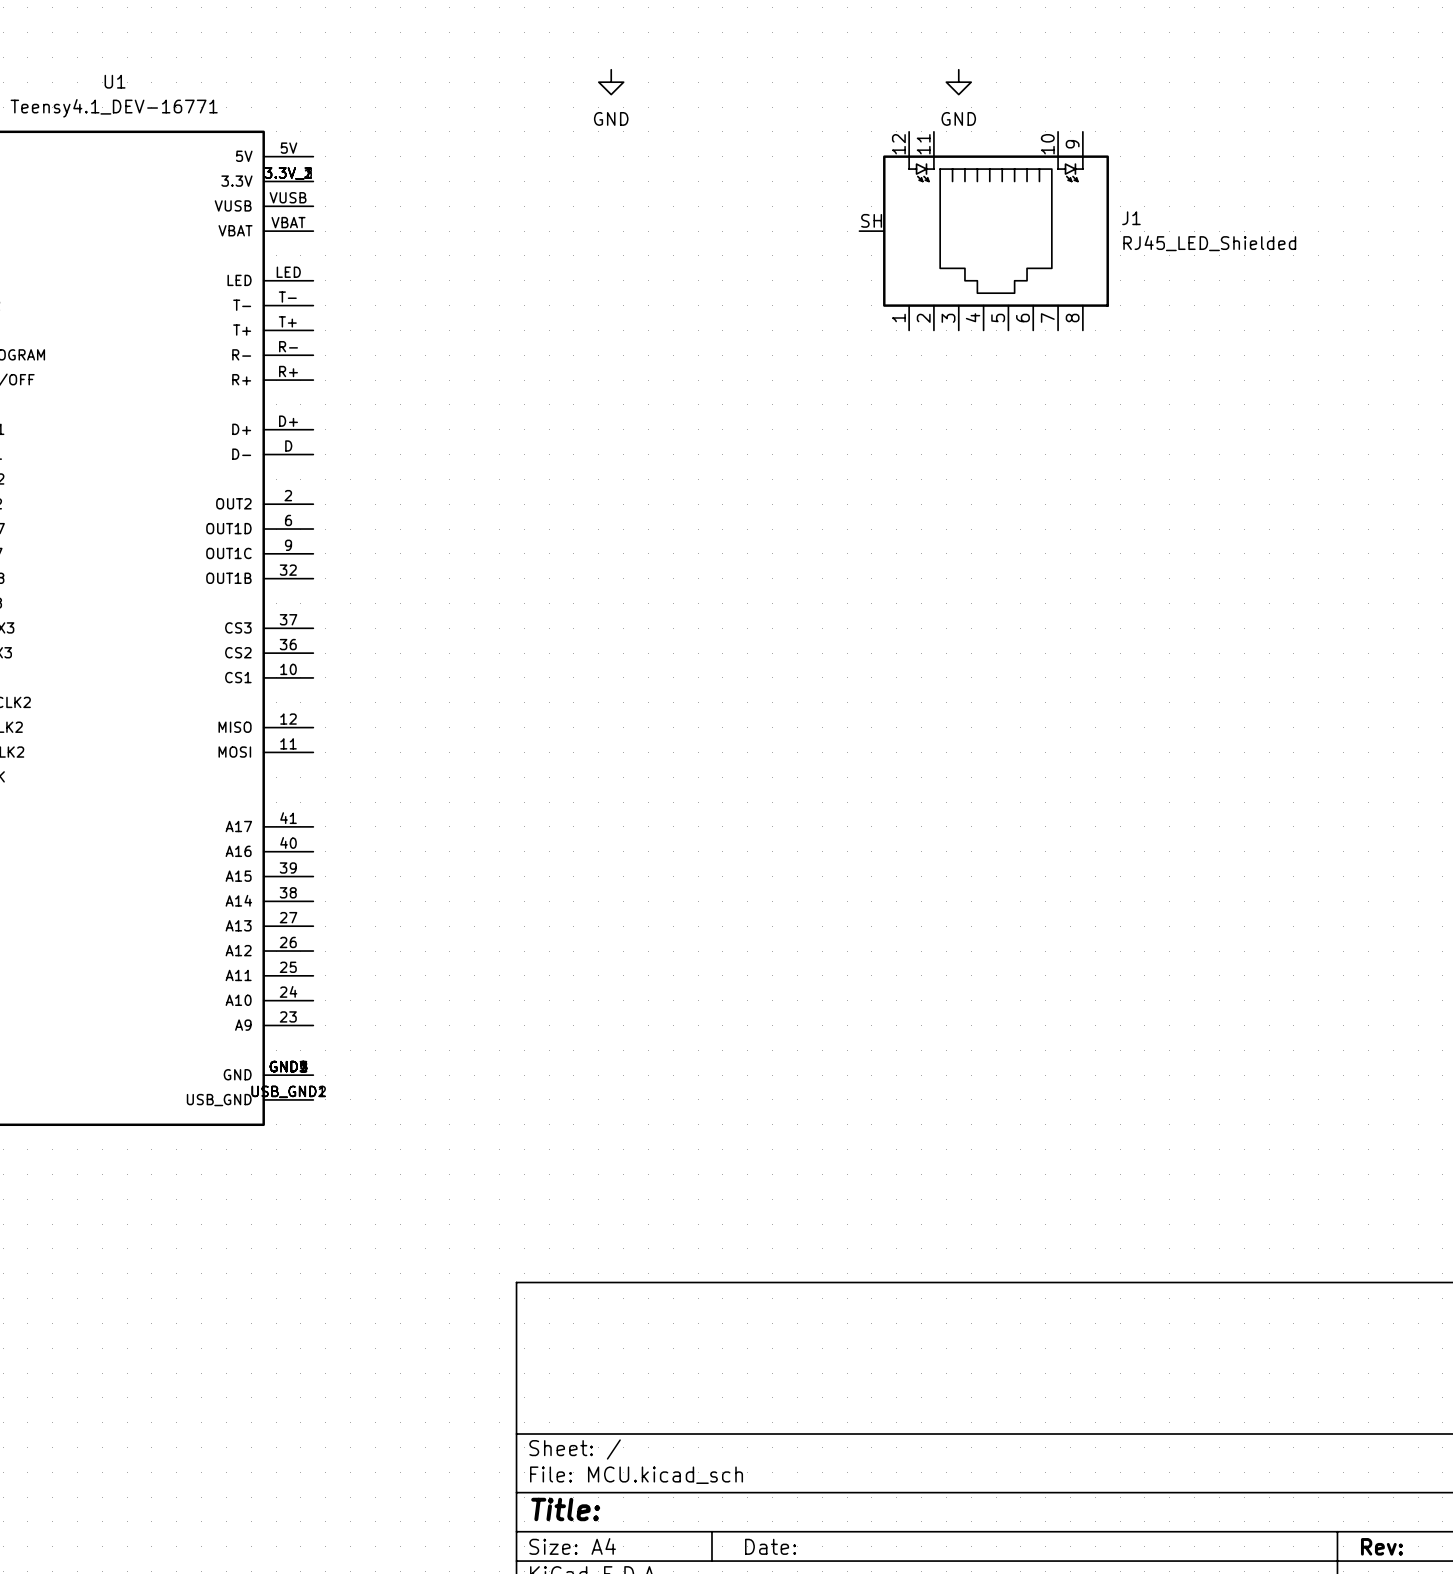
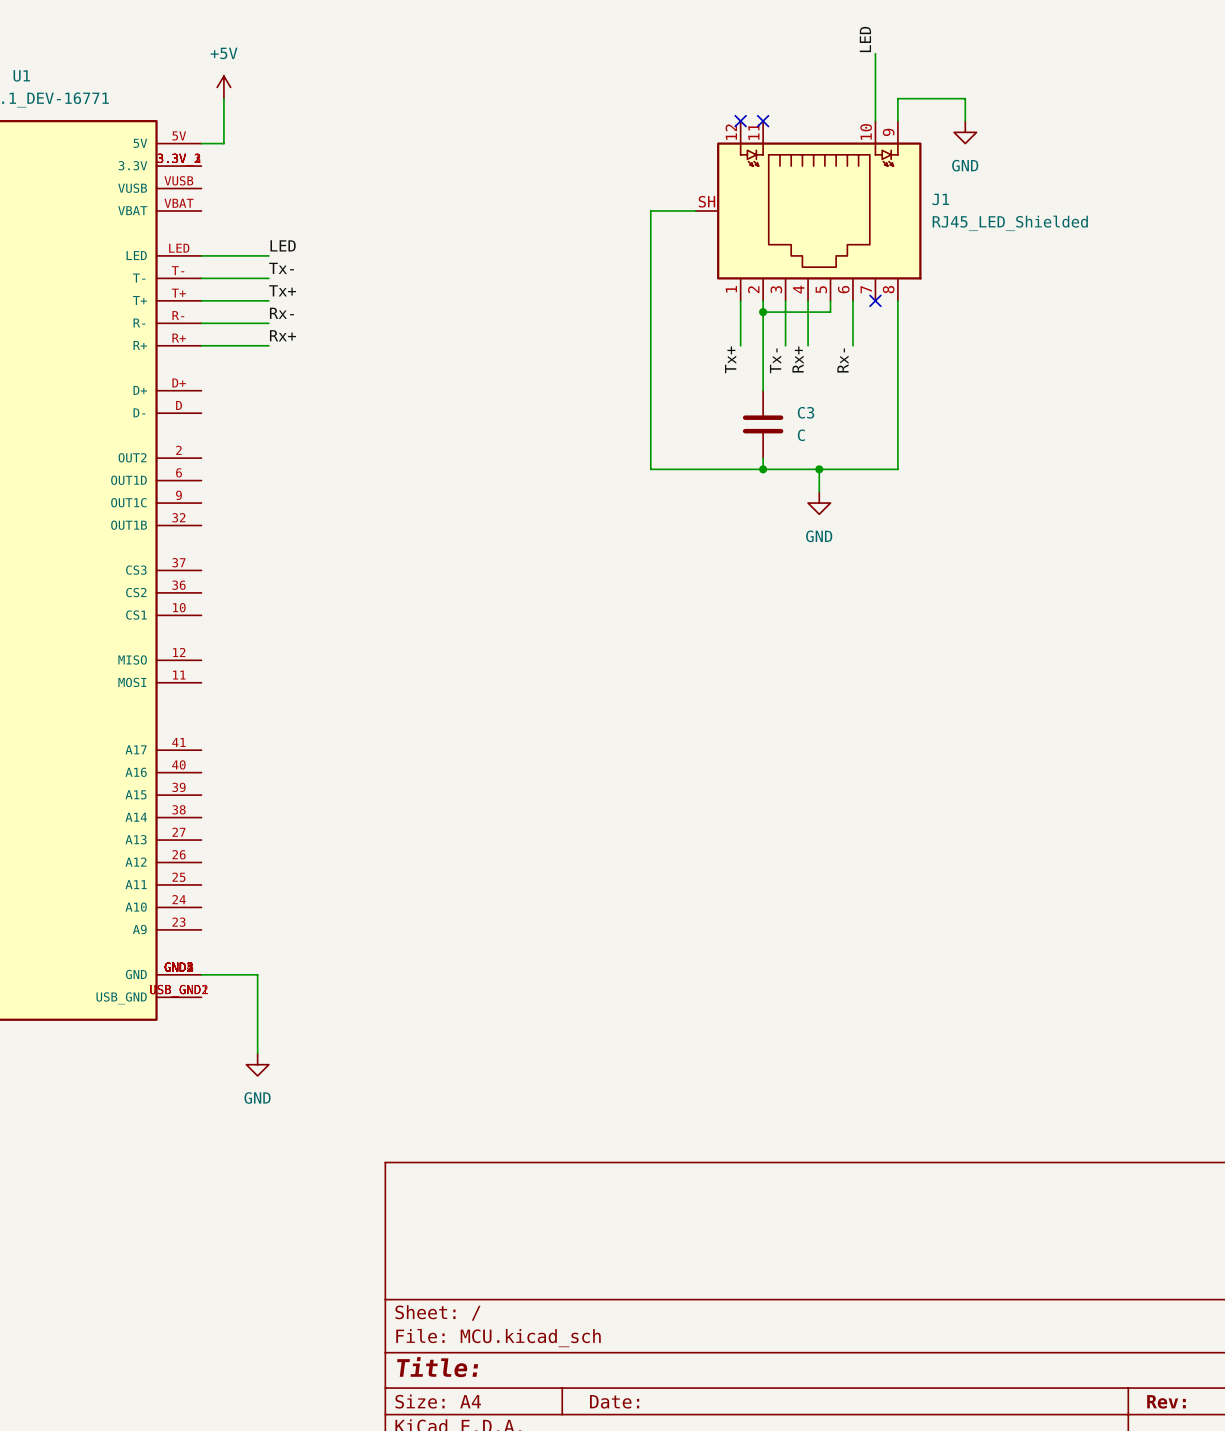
label: none -> LED (865, 39)
wire: none -> (875, 53) (875, 121)
power symbol: GND (611, 82) -> none
power symbol position: GND (958, 82) -> GND (965, 132)
power symbol: none -> +5V (223, 87)
wire: none -> (223, 98) (223, 143) (201, 143)
no-connect mark: none -> (740, 121)
no-connect mark: none -> (763, 121)
wire: none -> (897, 121) (897, 98) (965, 98) (965, 121)
wire: none -> (695, 210) (650, 210) (650, 469) (897, 469) (897, 300)
label: none -> LED (283, 245)
wire: none -> (201, 255) (268, 255)
label: none -> Tx- (281, 268)
wire: none -> (201, 278) (268, 278)
label: none -> Tx+ (282, 290)
wire: none -> (201, 300) (268, 300)
wire: none -> (740, 300) (740, 345)
wire: none -> (763, 300) (763, 390)
wire: none -> (785, 300) (785, 345)
wire: none -> (808, 300) (808, 345)
wire: none -> (830, 300) (830, 312) (763, 312)
wire: none -> (852, 300) (852, 345)
no-connect mark: none -> (875, 300)
junction: none -> (763, 312)
label: none -> Rx- (281, 313)
wire: none -> (201, 323) (268, 323)
label: none -> Rx+ (282, 335)
wire: none -> (201, 345) (268, 345)
label: none -> Tx+ (730, 359)
label: none -> Tx- (775, 360)
label: none -> Rx+ (798, 359)
label: none -> Rx- (842, 360)
C3: none -> C (763, 424)
wire: none -> (763, 458) (763, 469)
junction: none -> (763, 469)
wire: none -> (819, 469) (819, 491)
junction: none -> (819, 469)
power symbol: none -> GND (819, 503)
wire: none -> (201, 974) (257, 974) (257, 1053)
power symbol: none -> GND (257, 1064)

